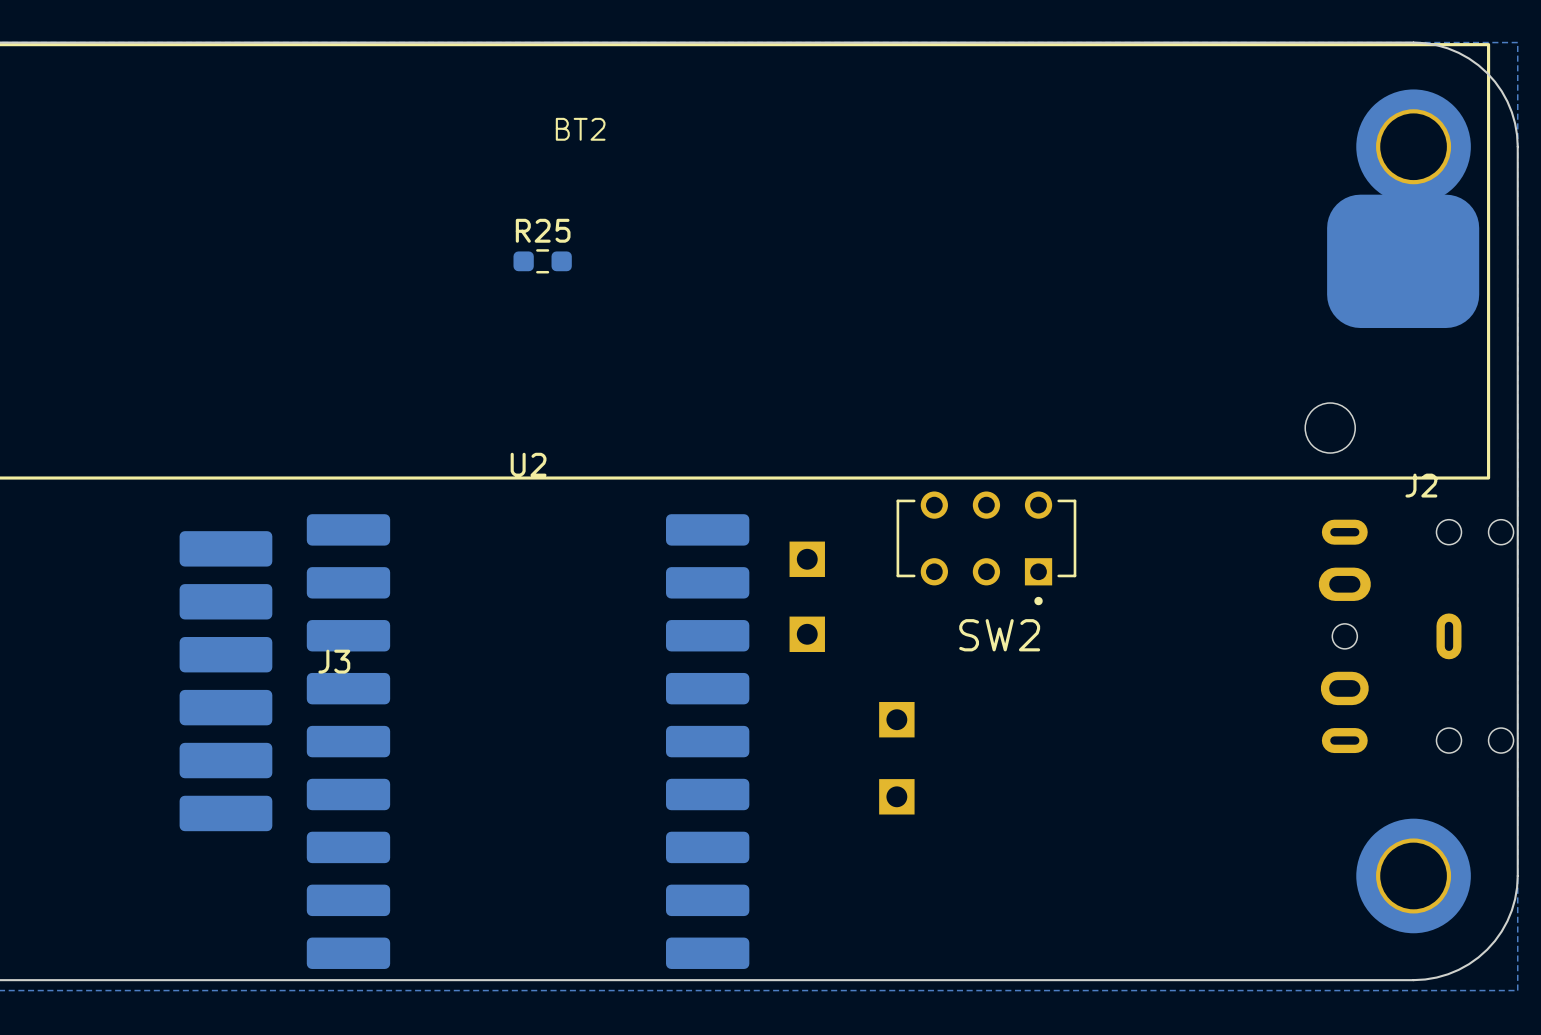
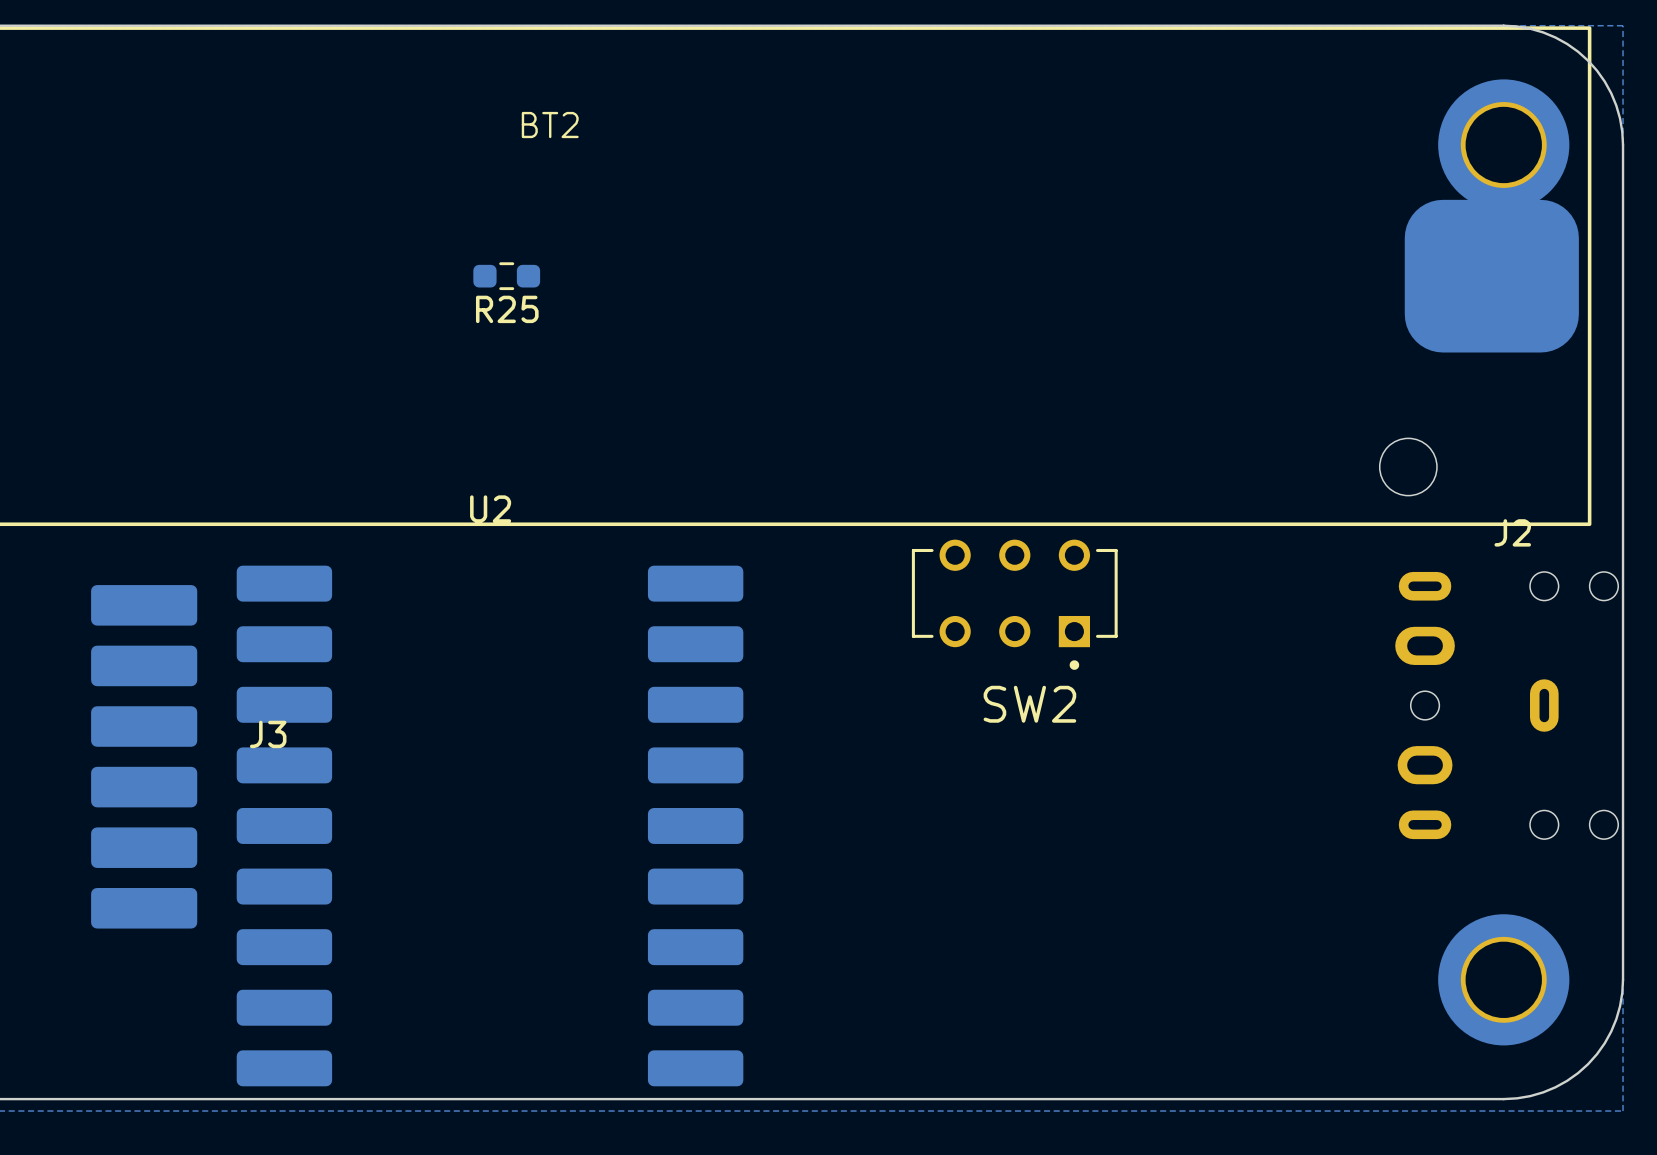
R25 name position: R25 (543, 230) -> R25 (507, 309)
part: (807, 559) -> none
part: (807, 634) -> none
part: (896, 719) -> none
part: (896, 796) -> none

